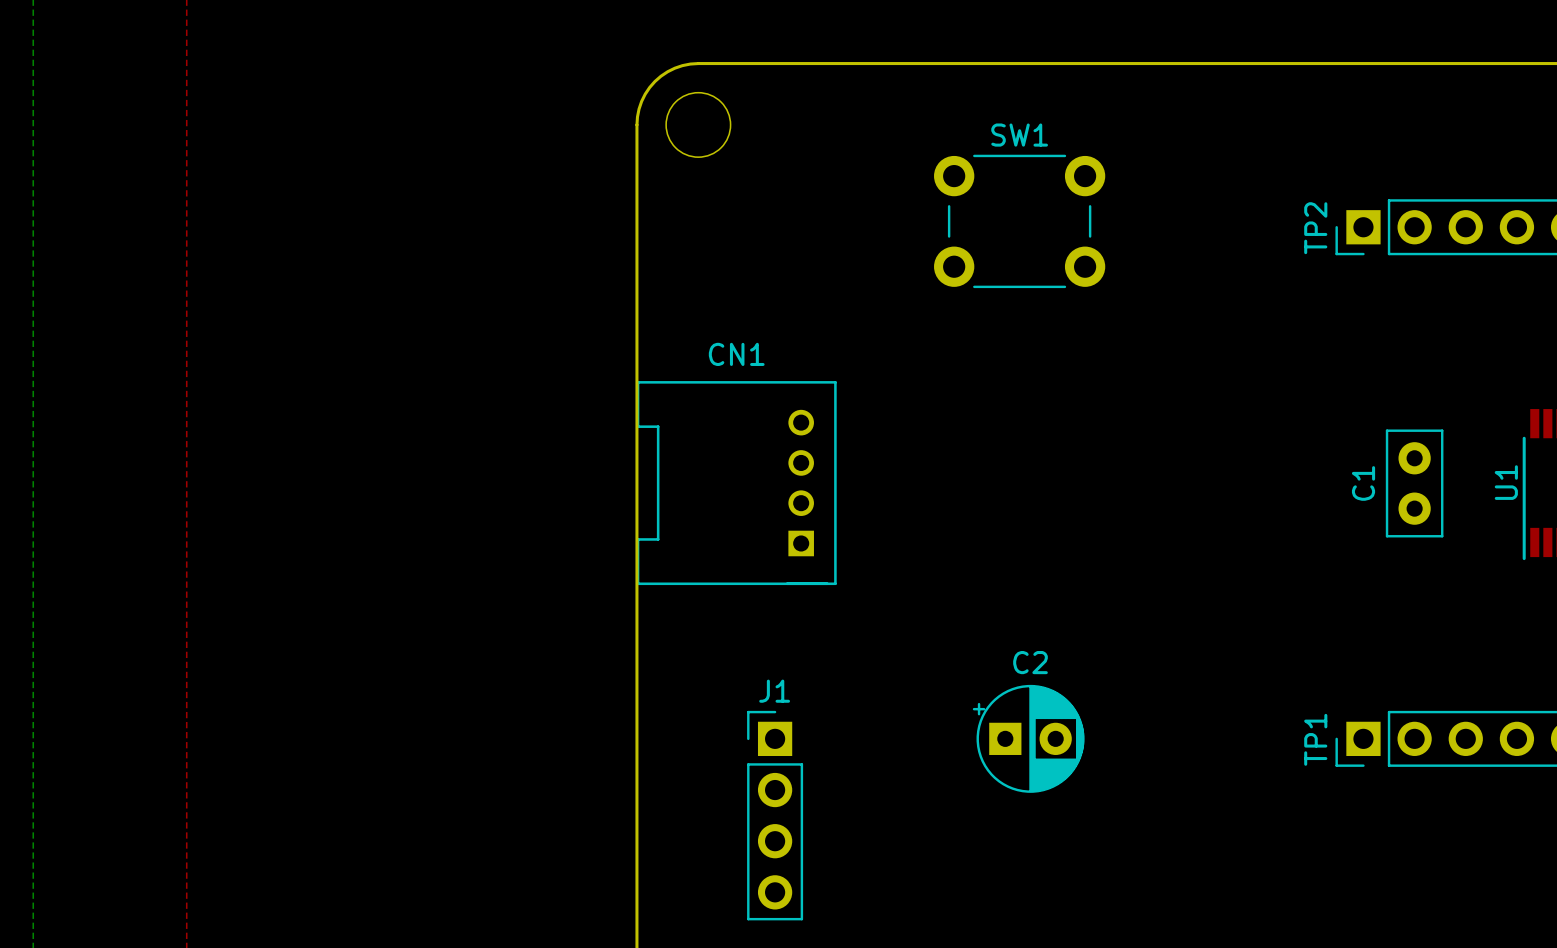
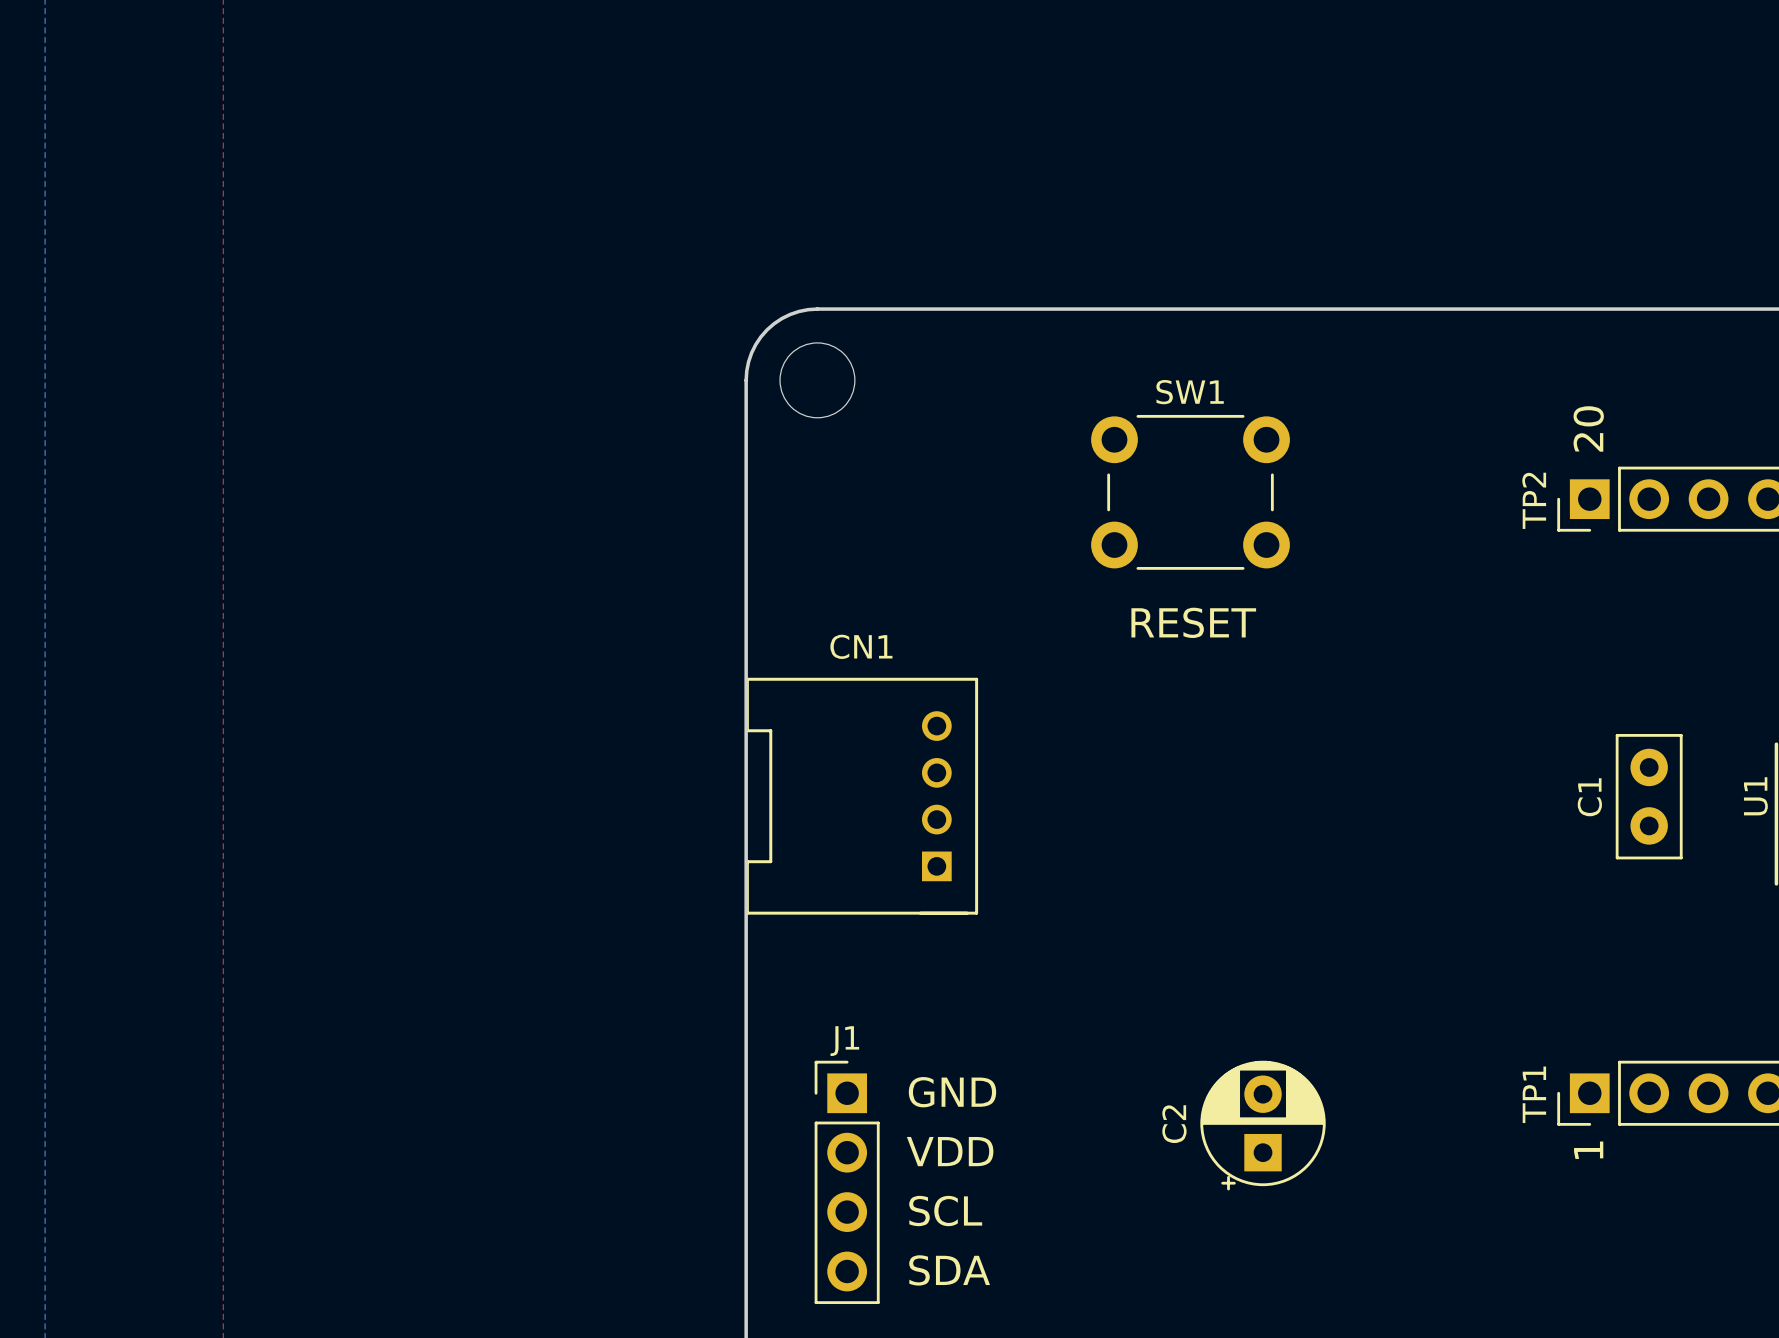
text: none -> 20 (1588, 428)
text: none -> RESET (1193, 622)
text: none -> GND (952, 1092)
C2 rotation: 0° (1028, 738) -> 90° counterclockwise (1263, 1125)
text: none -> VDD (950, 1151)
text: none -> 1 (1588, 1150)
J1 position: (775, 815) -> (847, 1182)
text: none -> SCL (945, 1211)
text: none -> SDA (949, 1270)

